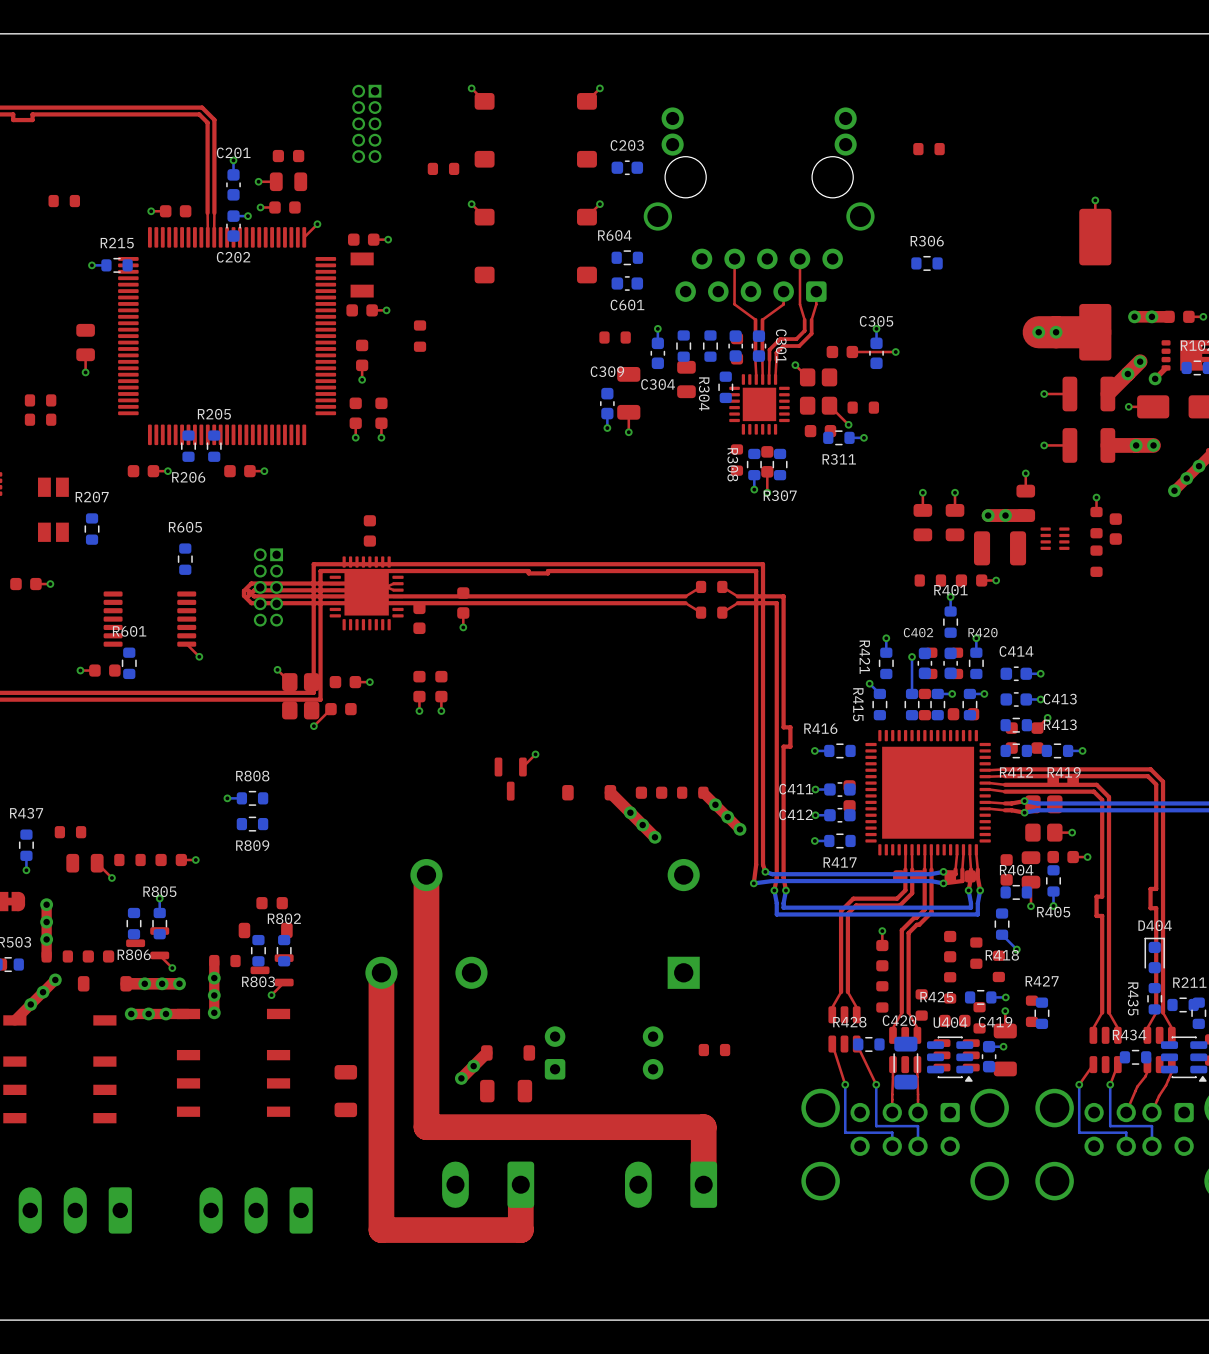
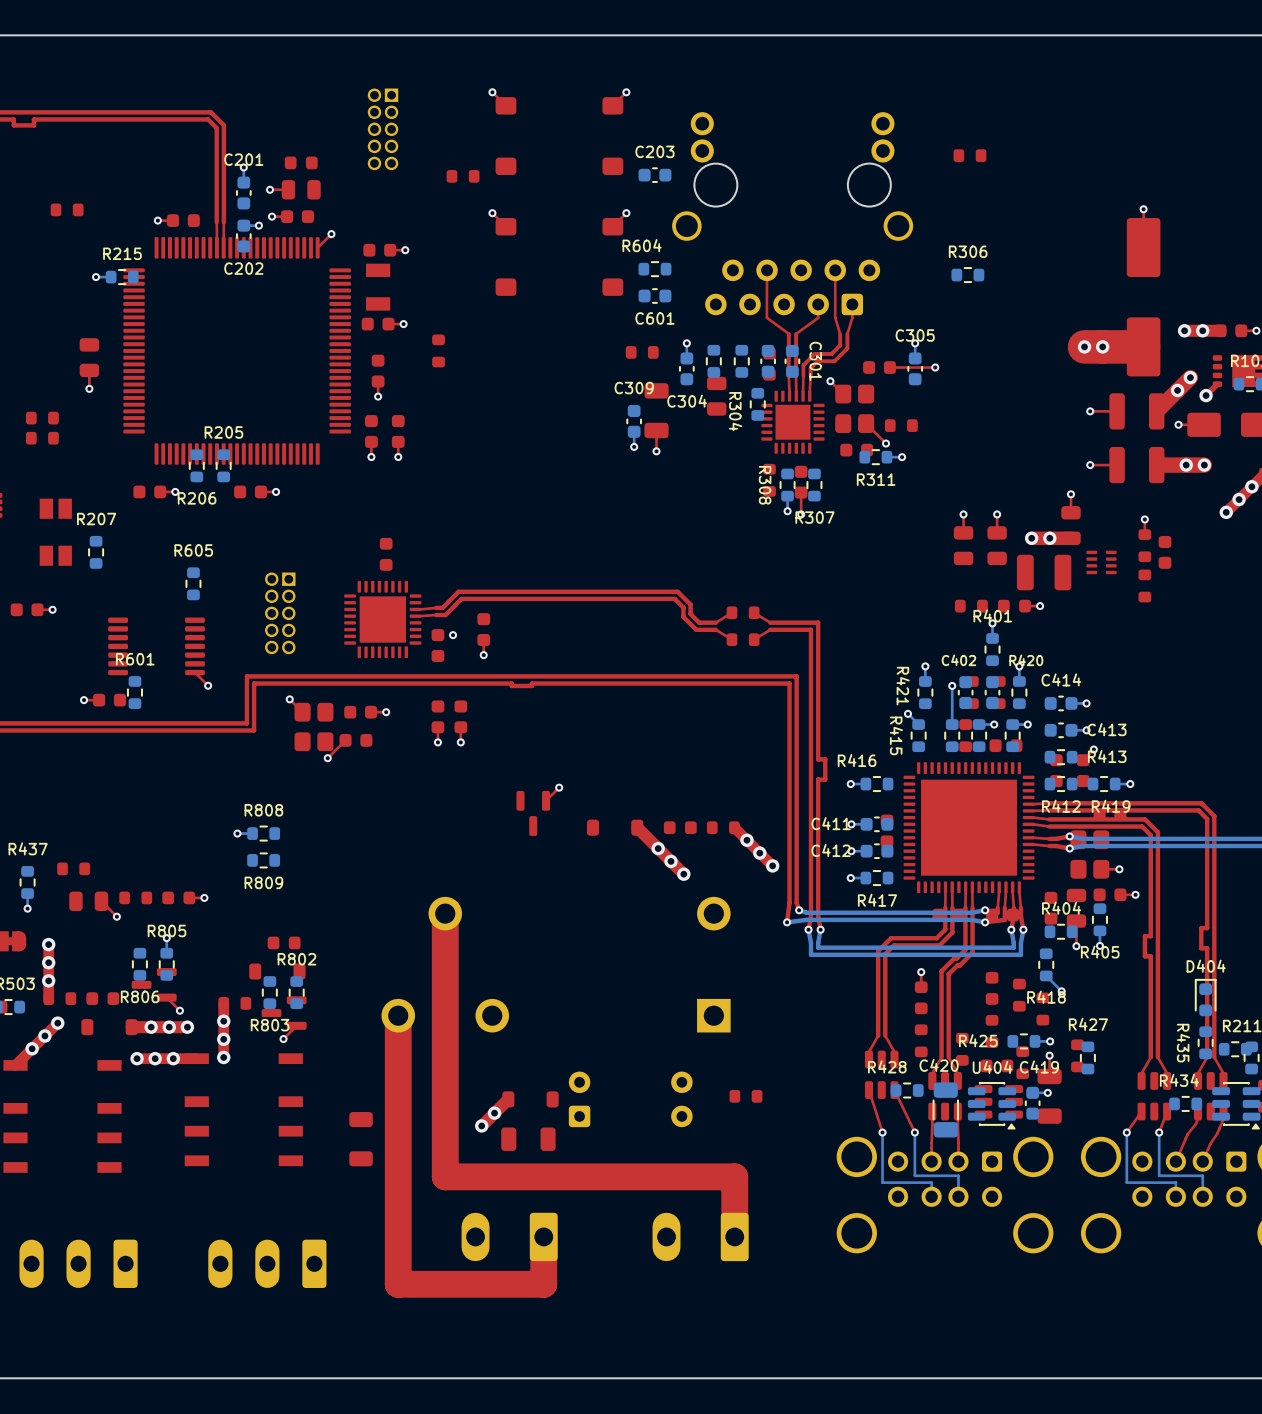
top track: none -> (448, 602) (442, 607) (420, 609)
top track: none -> (455, 605) (445, 615) (420, 616)
top track: (393, 583) (378, 590) (254, 590) (248, 595) (248, 590) (254, 596) (669, 596) -> (448, 601) (458, 591) (677, 591) (690, 604) (690, 614) (699, 622)
top track: (393, 590) (378, 583) (251, 583) (243, 590) (243, 595) (251, 603) (666, 603) -> (455, 604) (461, 598) (674, 598) (683, 607) (683, 616) (696, 629)
via: none -> (453, 635)
top track: (763, 647) (763, 564) (313, 564) (313, 692) (236, 692) -> (796, 676) (246, 676) (246, 723)
top track: (756, 654) (756, 571) (548, 571) (548, 573) (528, 573) (528, 571) (320, 571) (320, 699) (243, 699) -> (789, 683) (531, 683) (531, 685) (511, 685) (511, 683) (254, 683) (254, 730)

